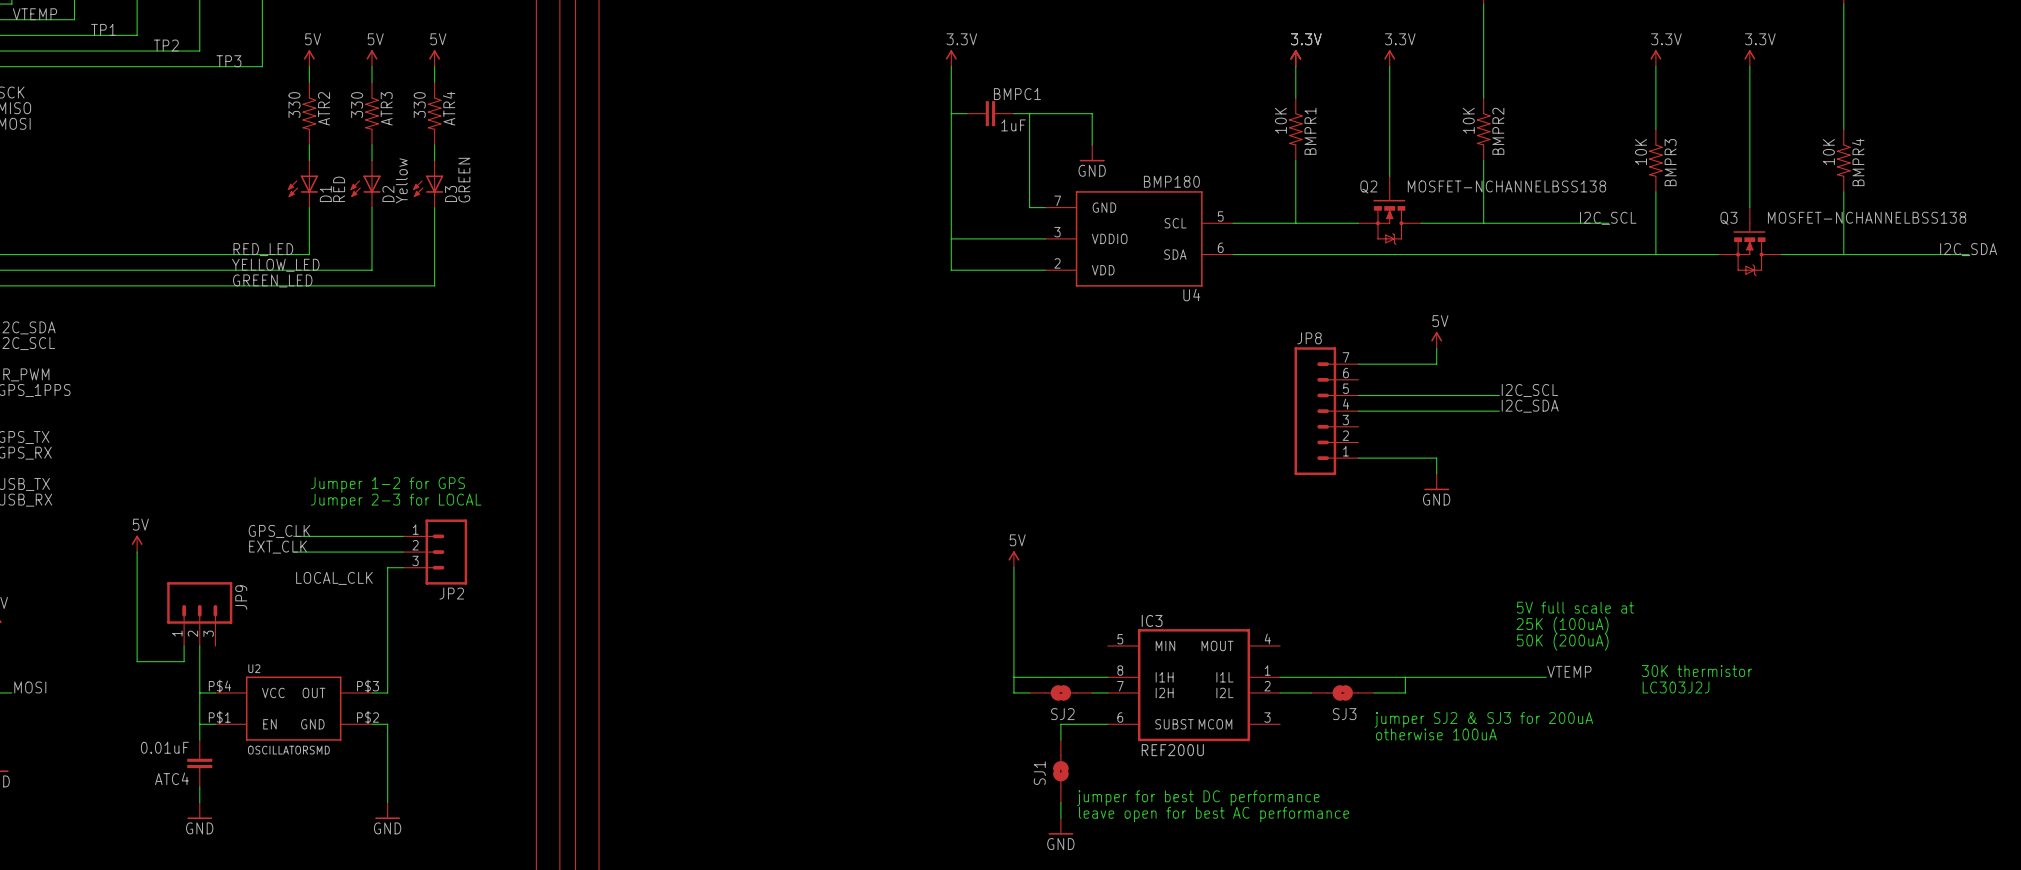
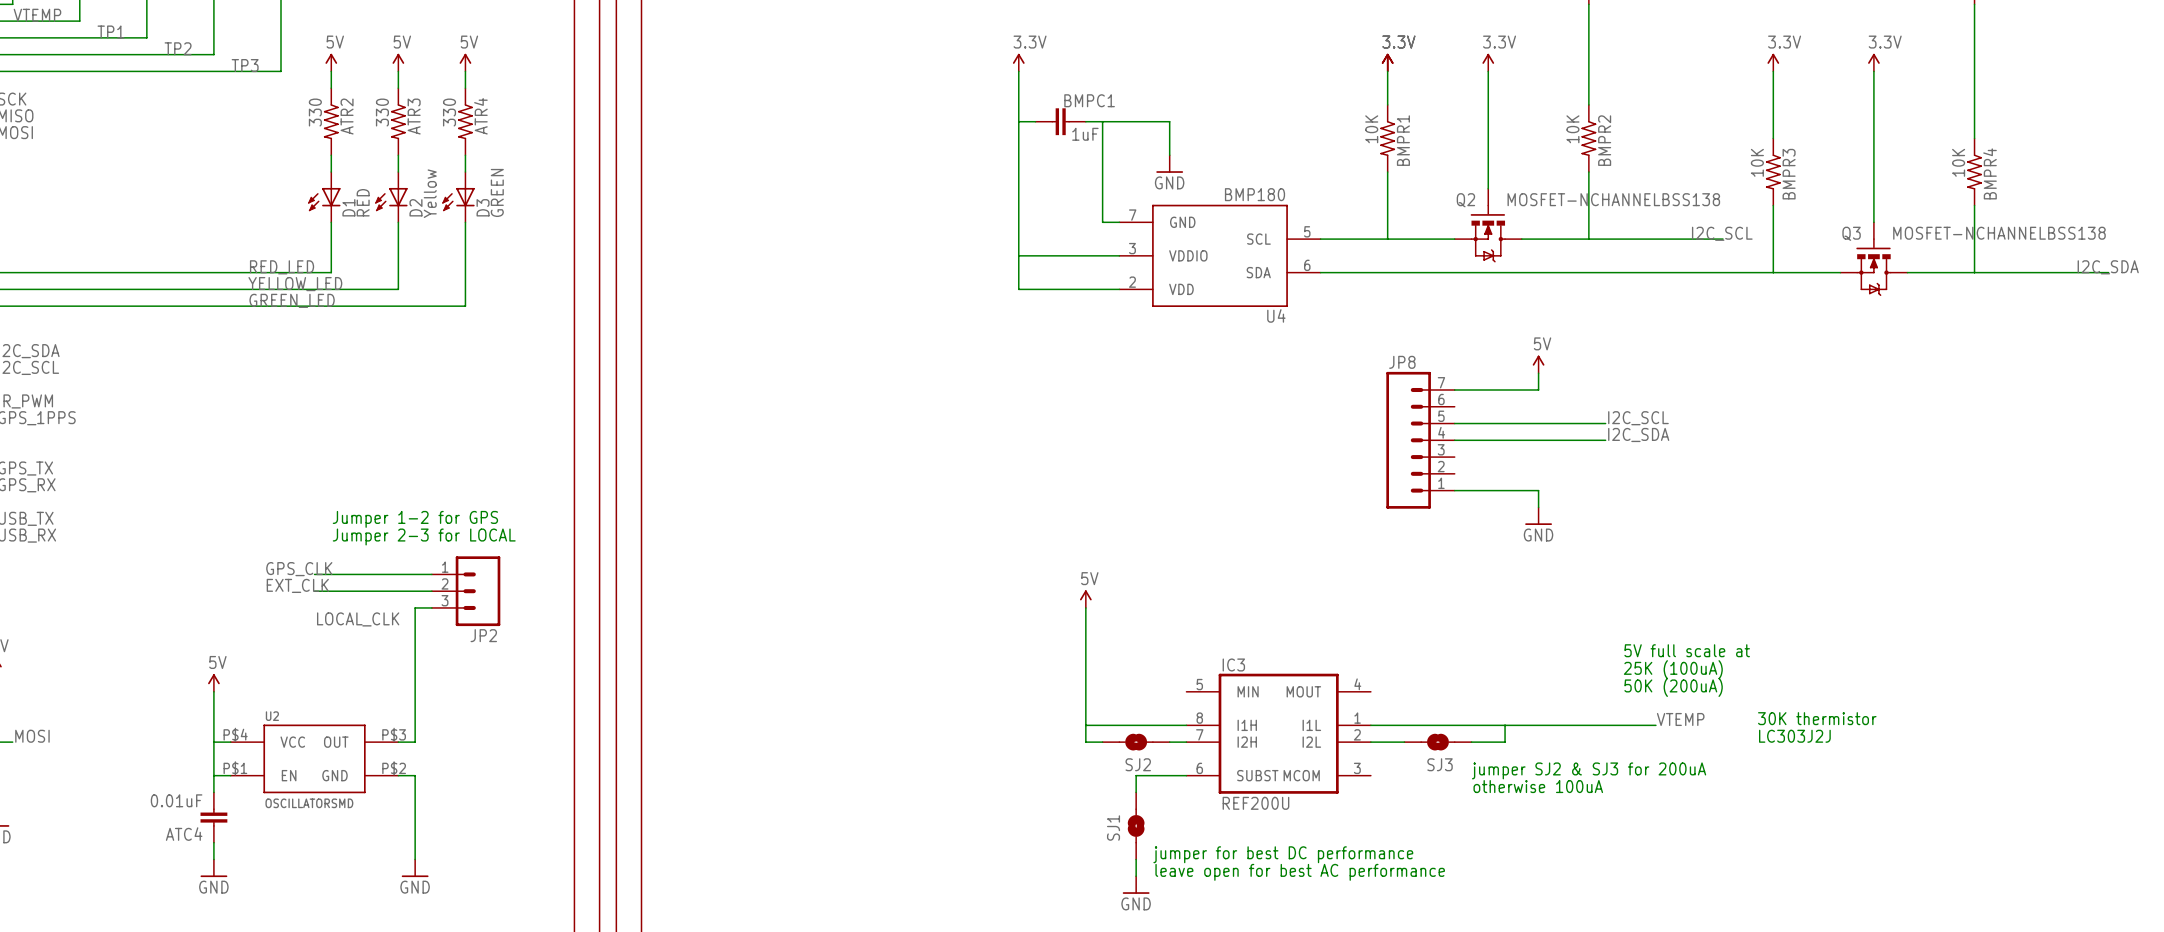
power symbol position: 5V (137, 543) -> 5V (213, 683)
wire: (137, 552) (137, 661) (184, 661) (184, 646) -> none
JP9: (199, 614) -> none

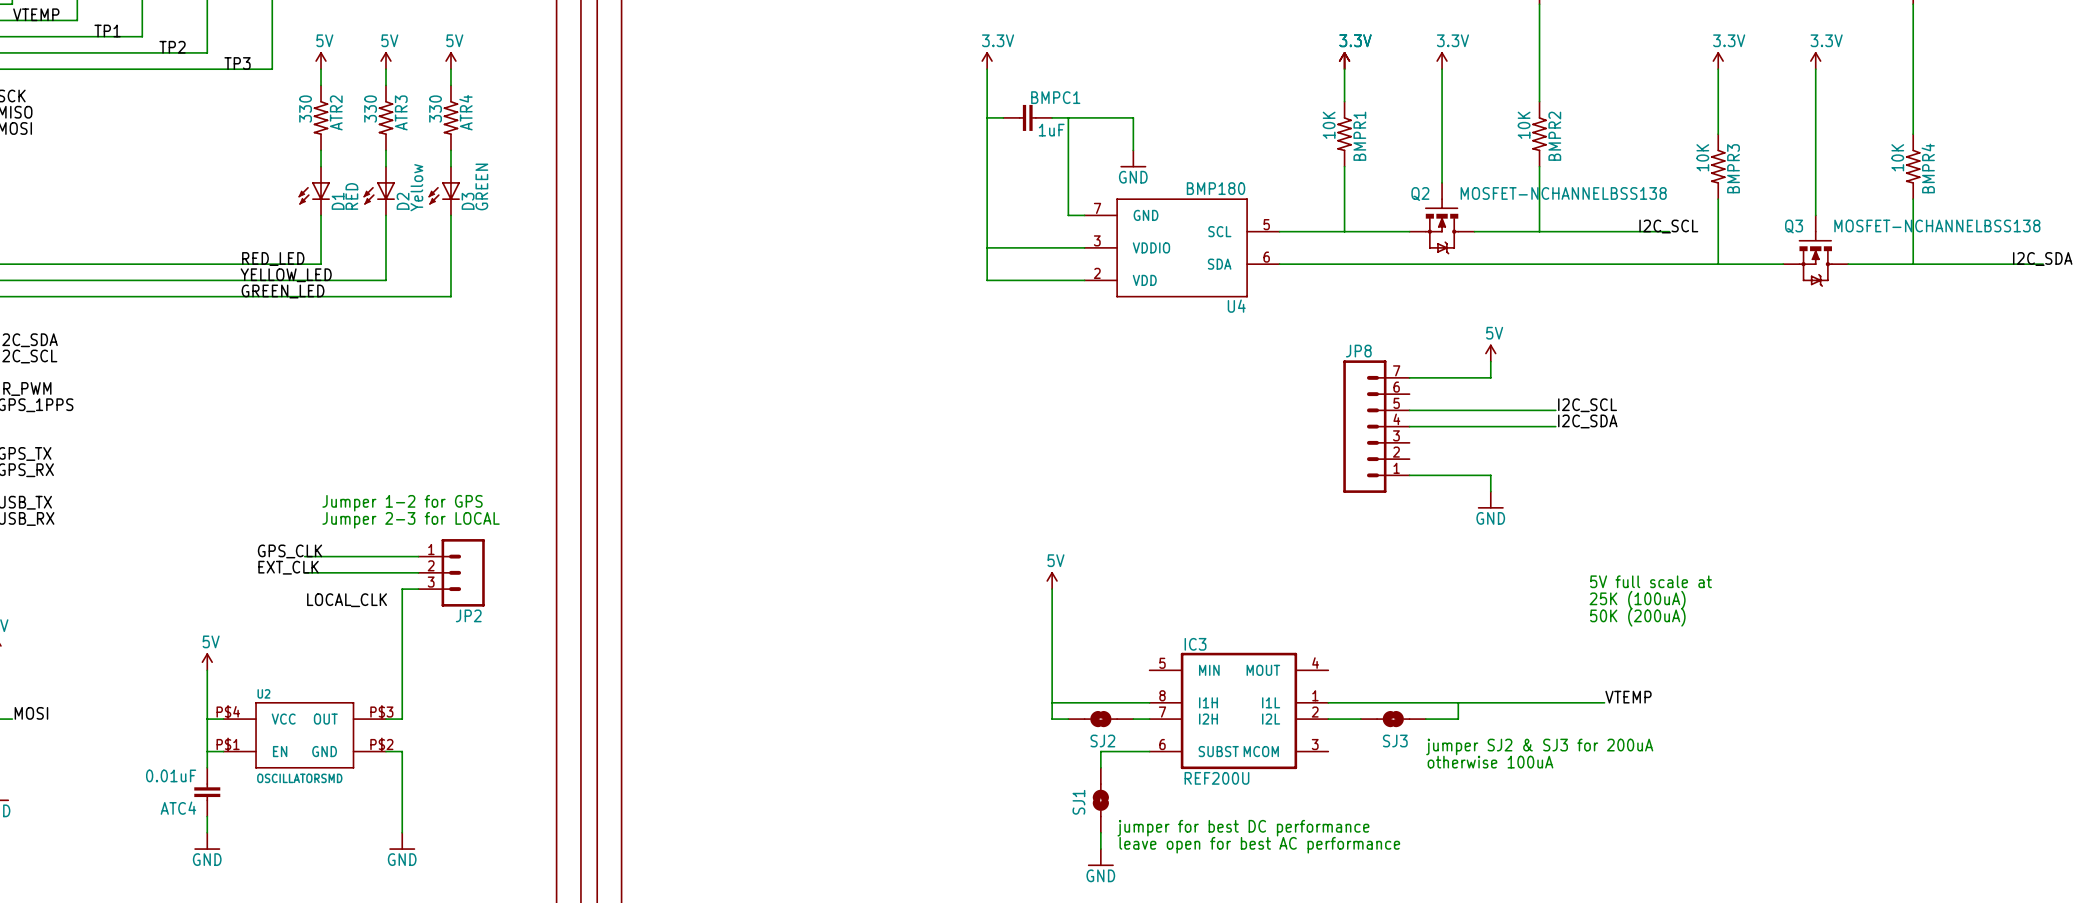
text position: 5V full scale at (1687, 650) -> 5V full scale at (1651, 581)
text position: 25K (100uA) (1673, 669) -> 25K (100uA) (1637, 600)
text position: 50K (200uA) (1673, 687) -> 50K (200uA) (1637, 617)
text: 30K thermistor (1817, 718) -> none
text: LC303J2J (1794, 736) -> none

